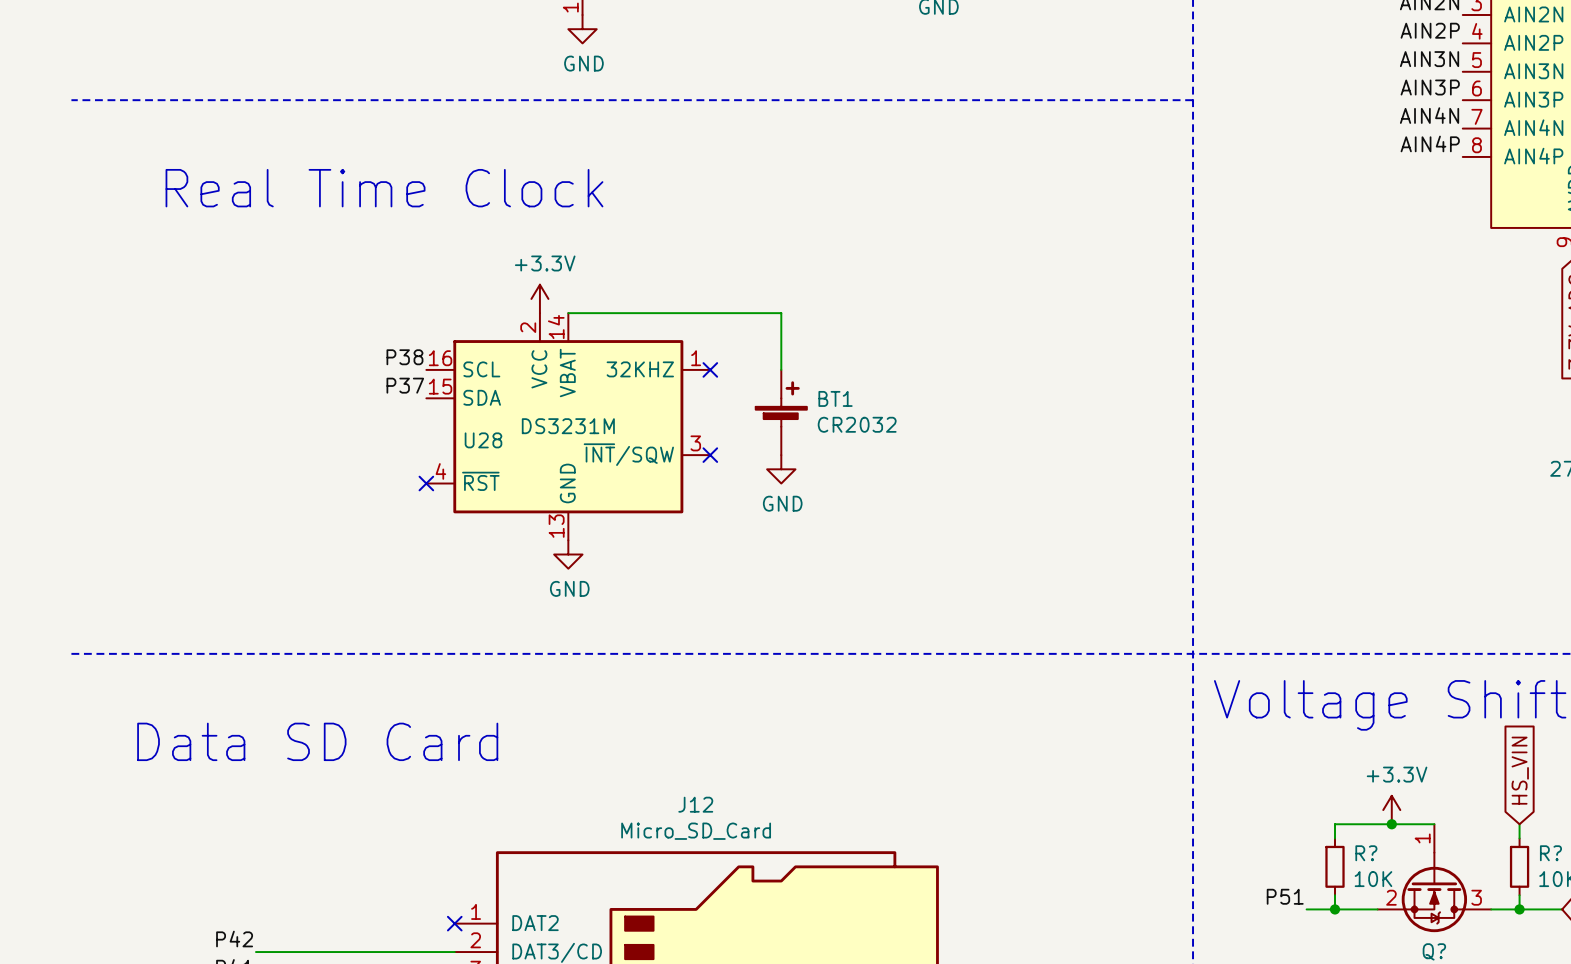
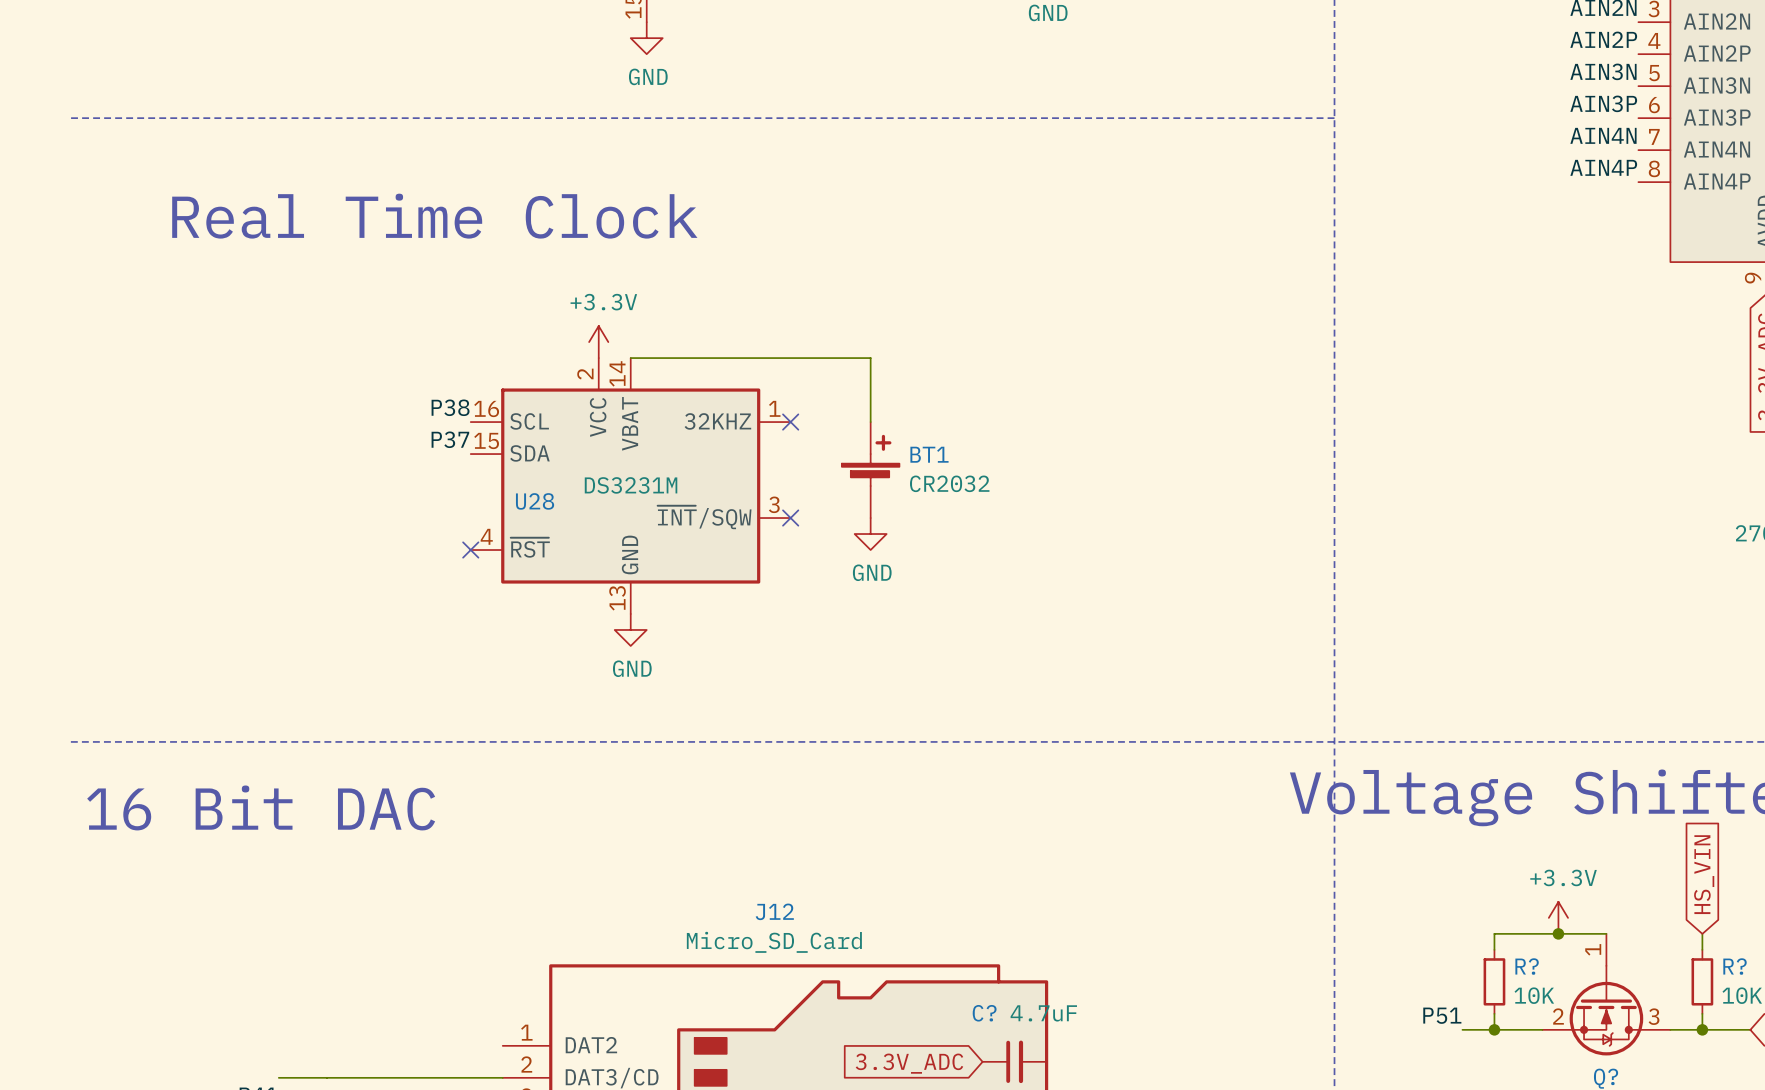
text: none -> 16 Bit DAC (261, 807)
text: Data SD Card (317, 741) -> none
no-connect mark: (454, 923) -> none
C?: none -> 4.7uF (1014, 1061)
global label: none -> 3.3V_ADC (909, 1063)
label: P42 (234, 939) -> none

